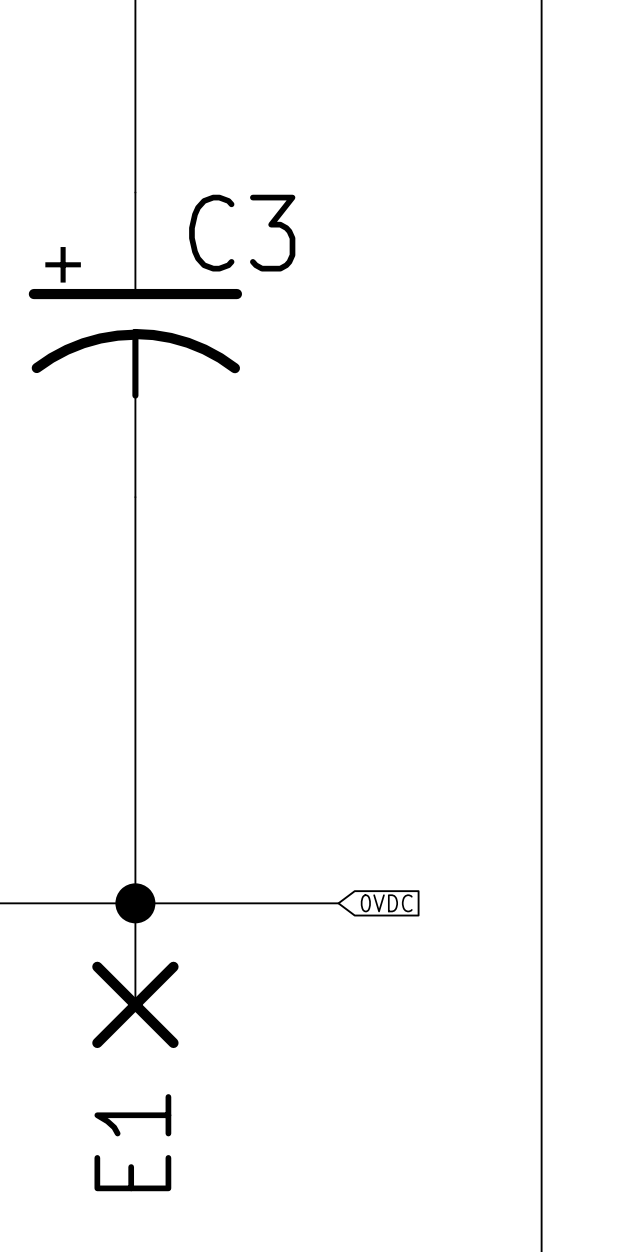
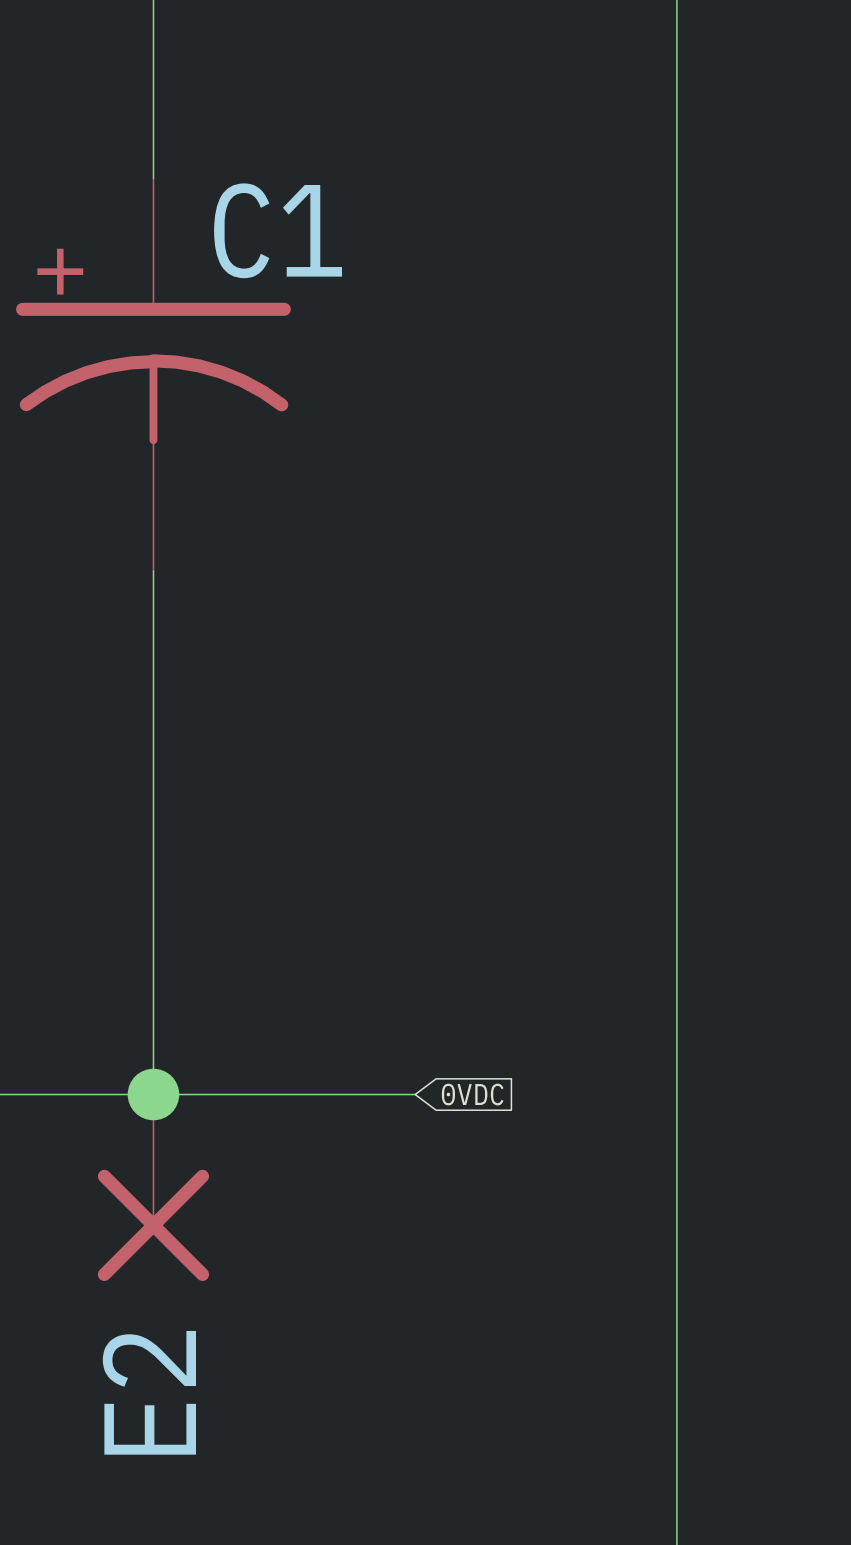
C3 name: C3 (242, 233) -> C1 (278, 230)
E1 name: E1 (132, 1142) -> E2 (149, 1392)

